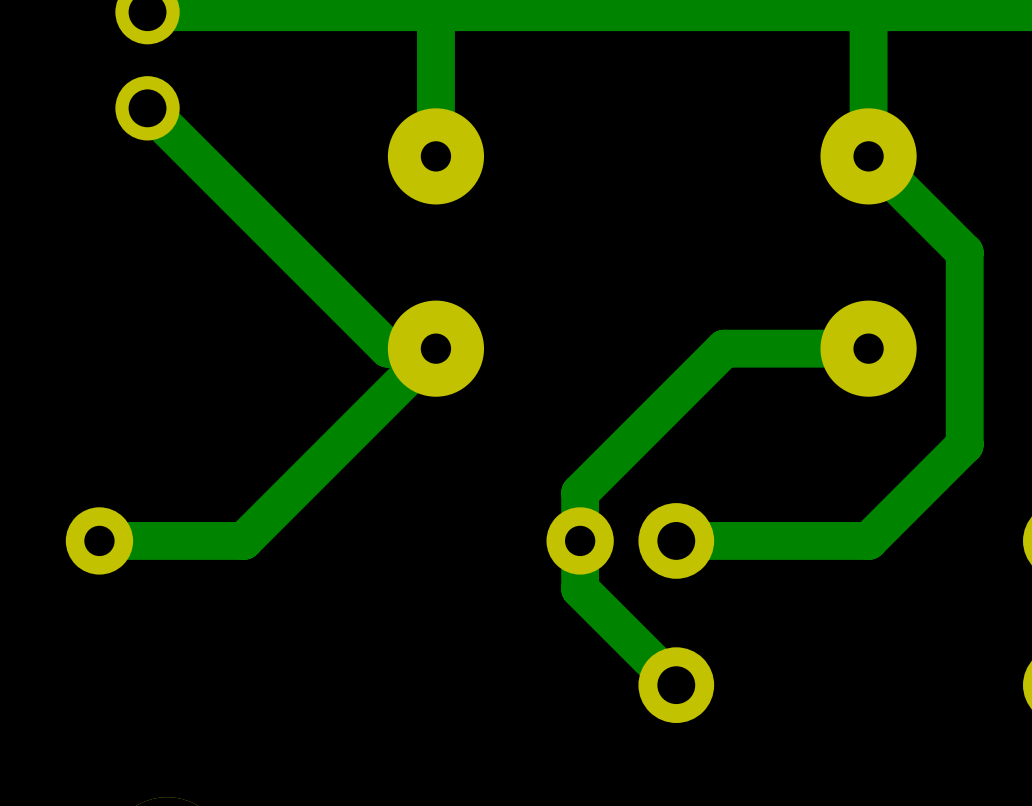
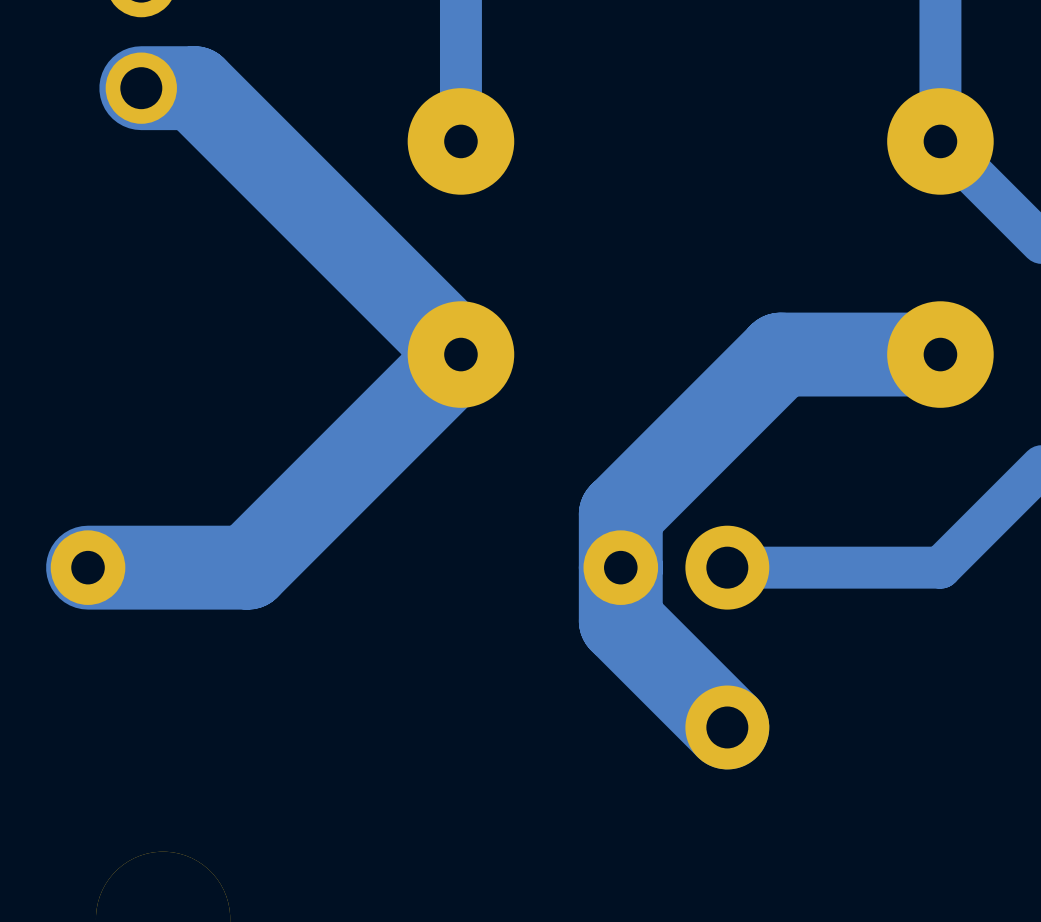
track: (147, 108) (387, 348) (435, 348) -> (141, 88) (194, 88) (460, 354)
track width: thin (435, 348) (243, 540) (99, 540) -> thick (460, 354) (247, 567) (88, 567)
track width: thin (868, 348) (724, 348) (580, 492) (580, 589) (676, 685) -> thick (940, 354) (780, 354) (620, 514) (620, 620) (727, 727)

